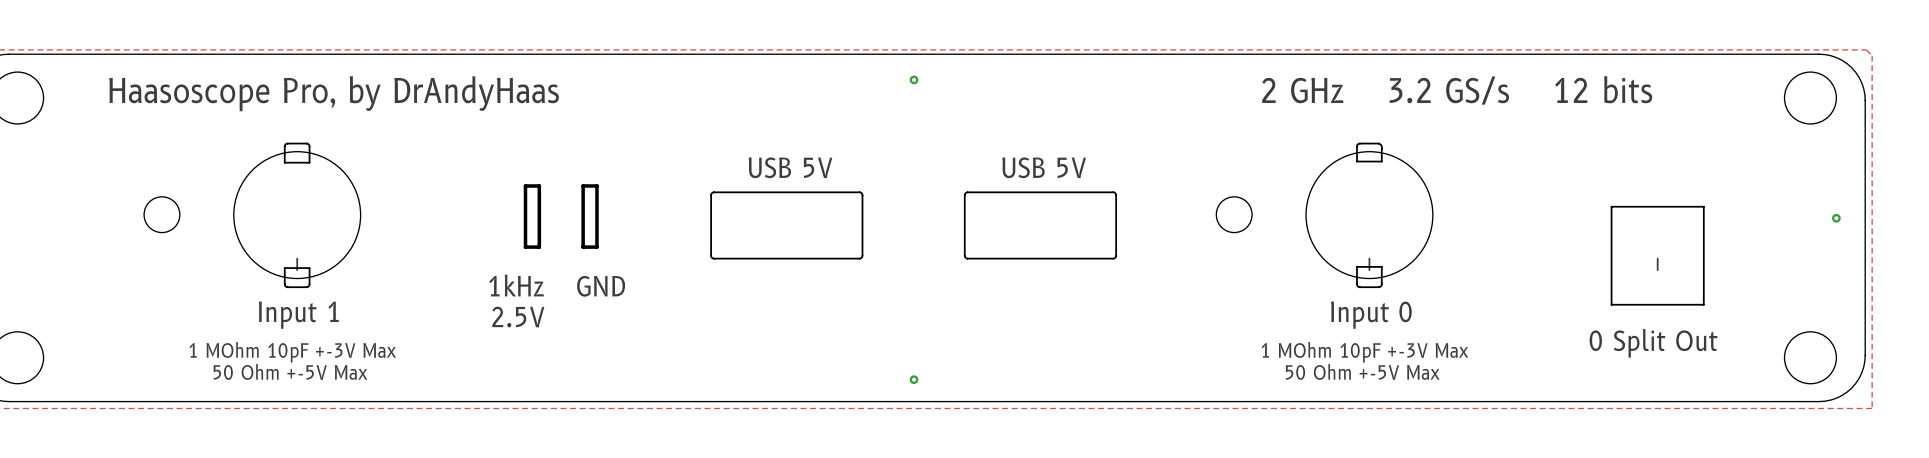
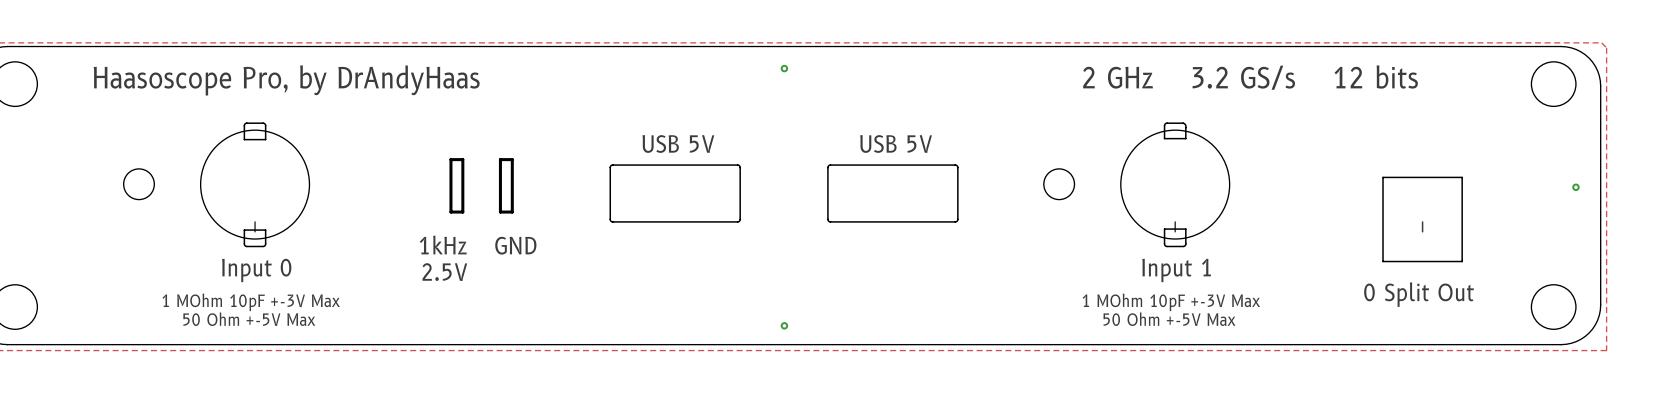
text: Input 1 (298, 315) -> Input 0 (256, 270)
text: Input 0 (1371, 315) -> Input 1 (1176, 270)

